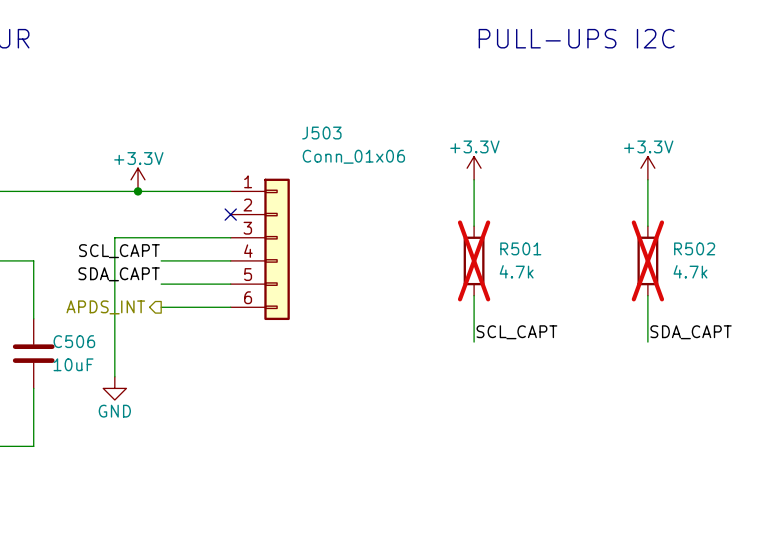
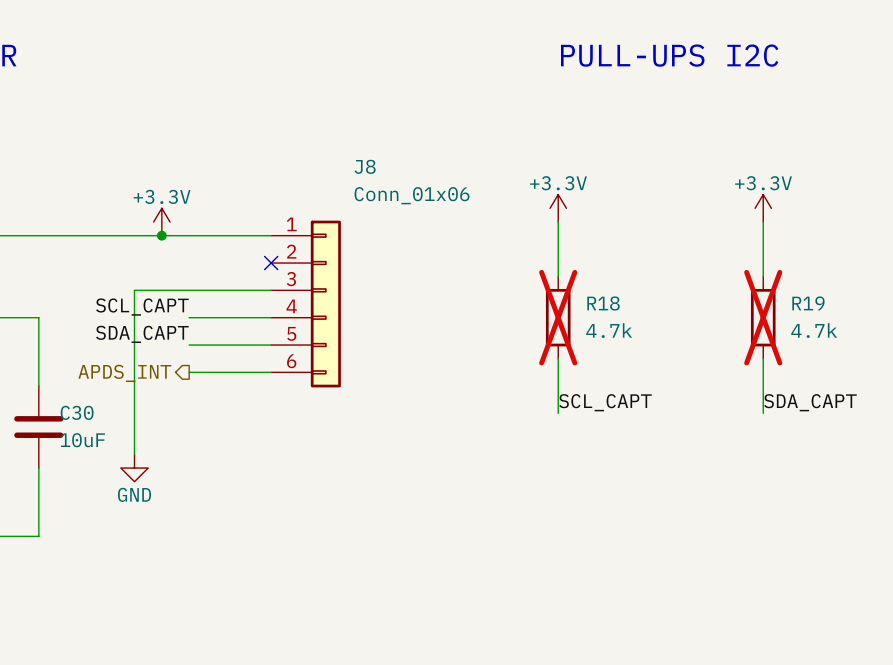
J503 name: J503 (321, 133) -> J8 (365, 166)
R501 name: R501 (520, 248) -> R18 (603, 303)
R502 name: R502 (694, 248) -> R19 (808, 303)
C506 name: C506 (74, 341) -> C30 (77, 412)

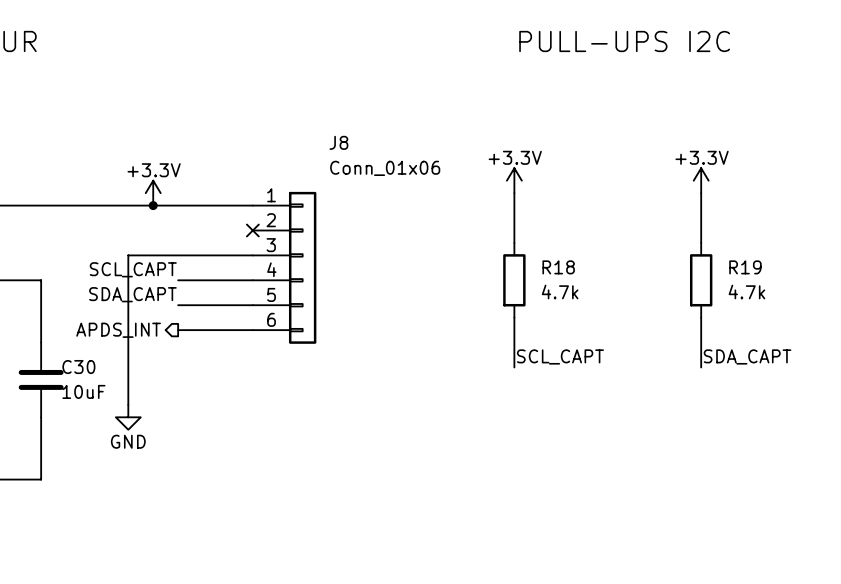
R18 do-not-place cross: (558, 317) -> none
R19 do-not-place cross: (763, 317) -> none

